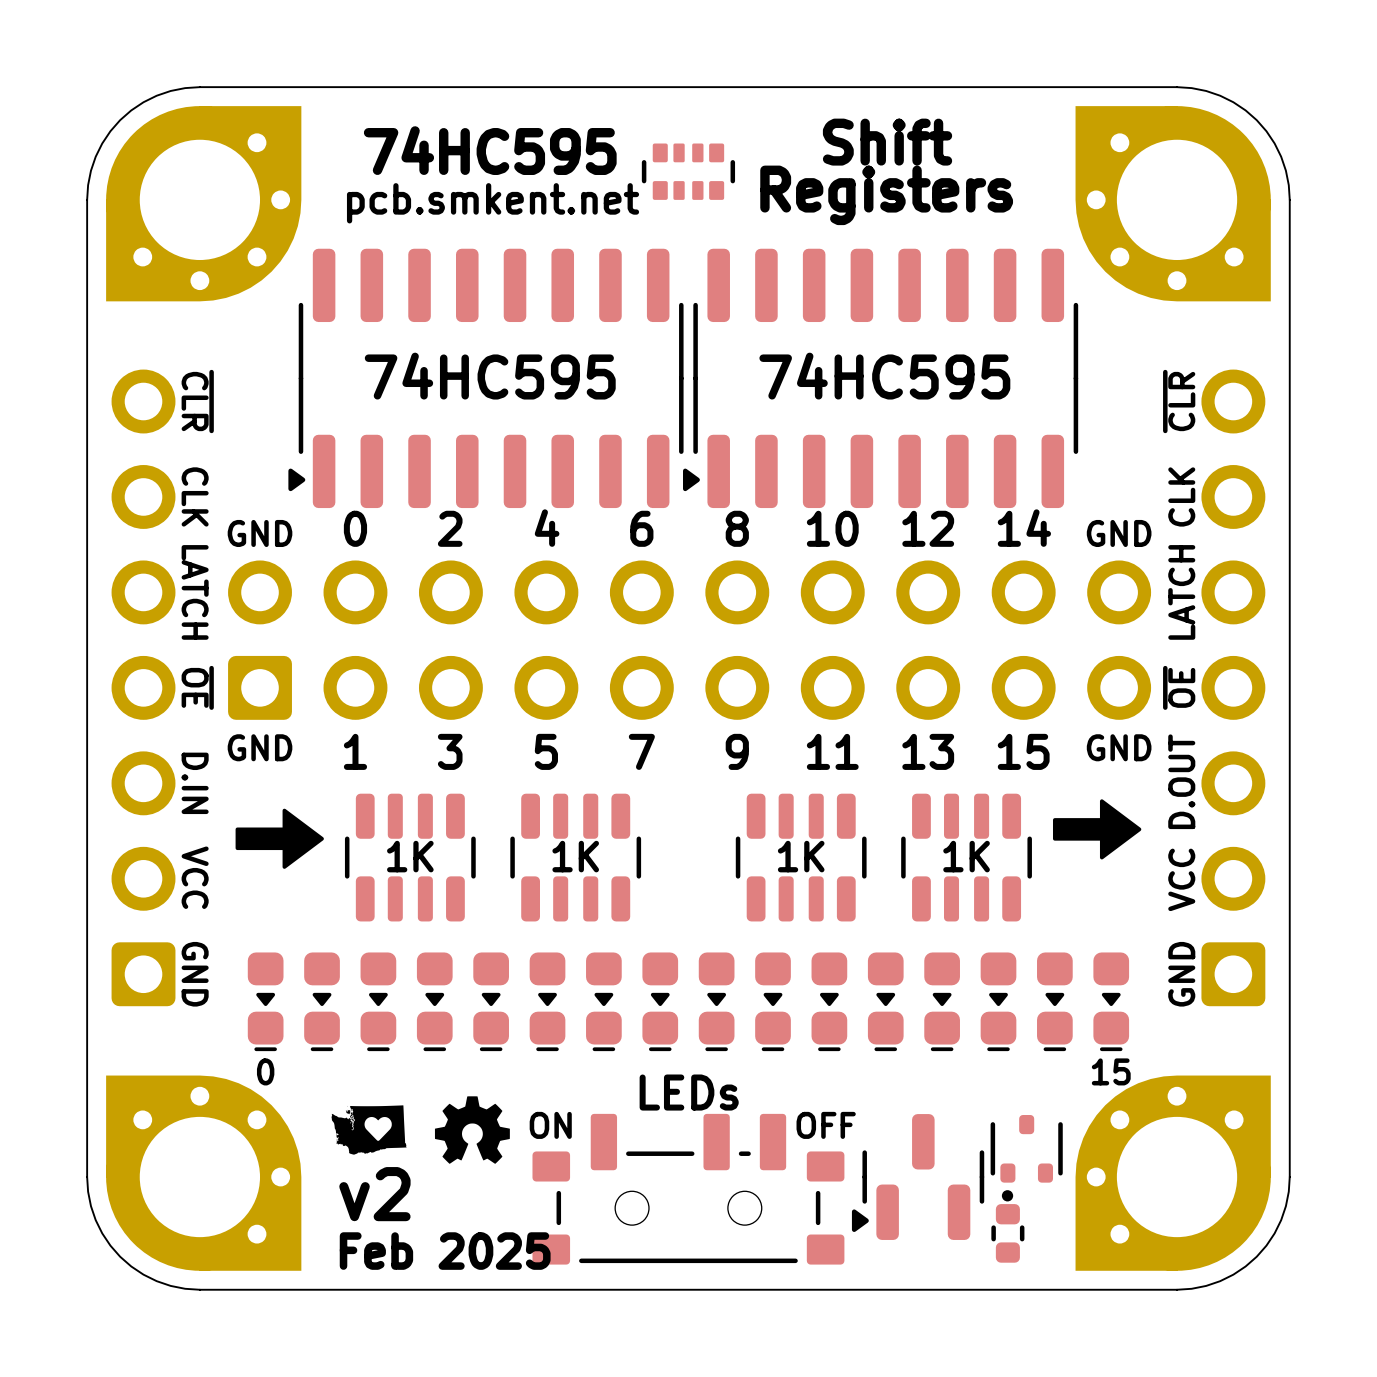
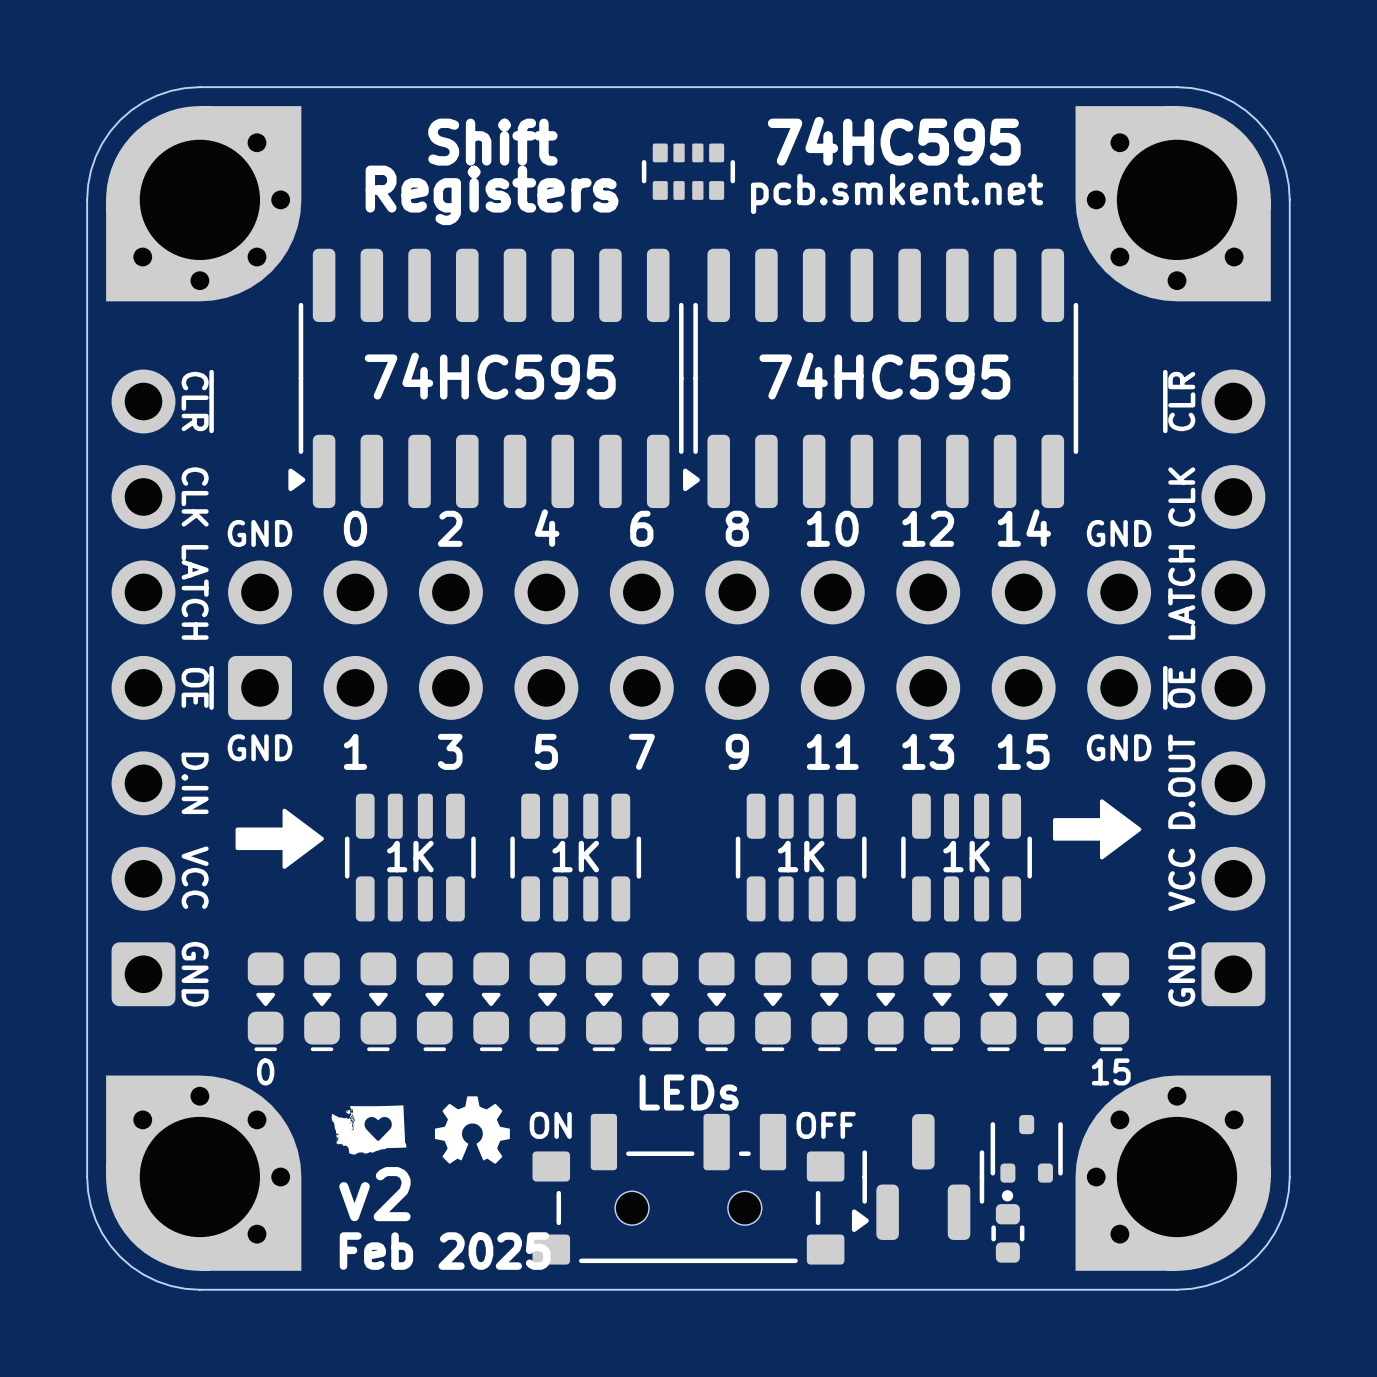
text position: Shift (887, 142) -> Shift (492, 142)
text position: 74HC595 (490, 150) -> 74HC595 (894, 141)
text position: Registers (886, 195) -> Registers (492, 195)
text position: pcb.smkent.net (493, 203) -> pcb.smkent.net (897, 193)

